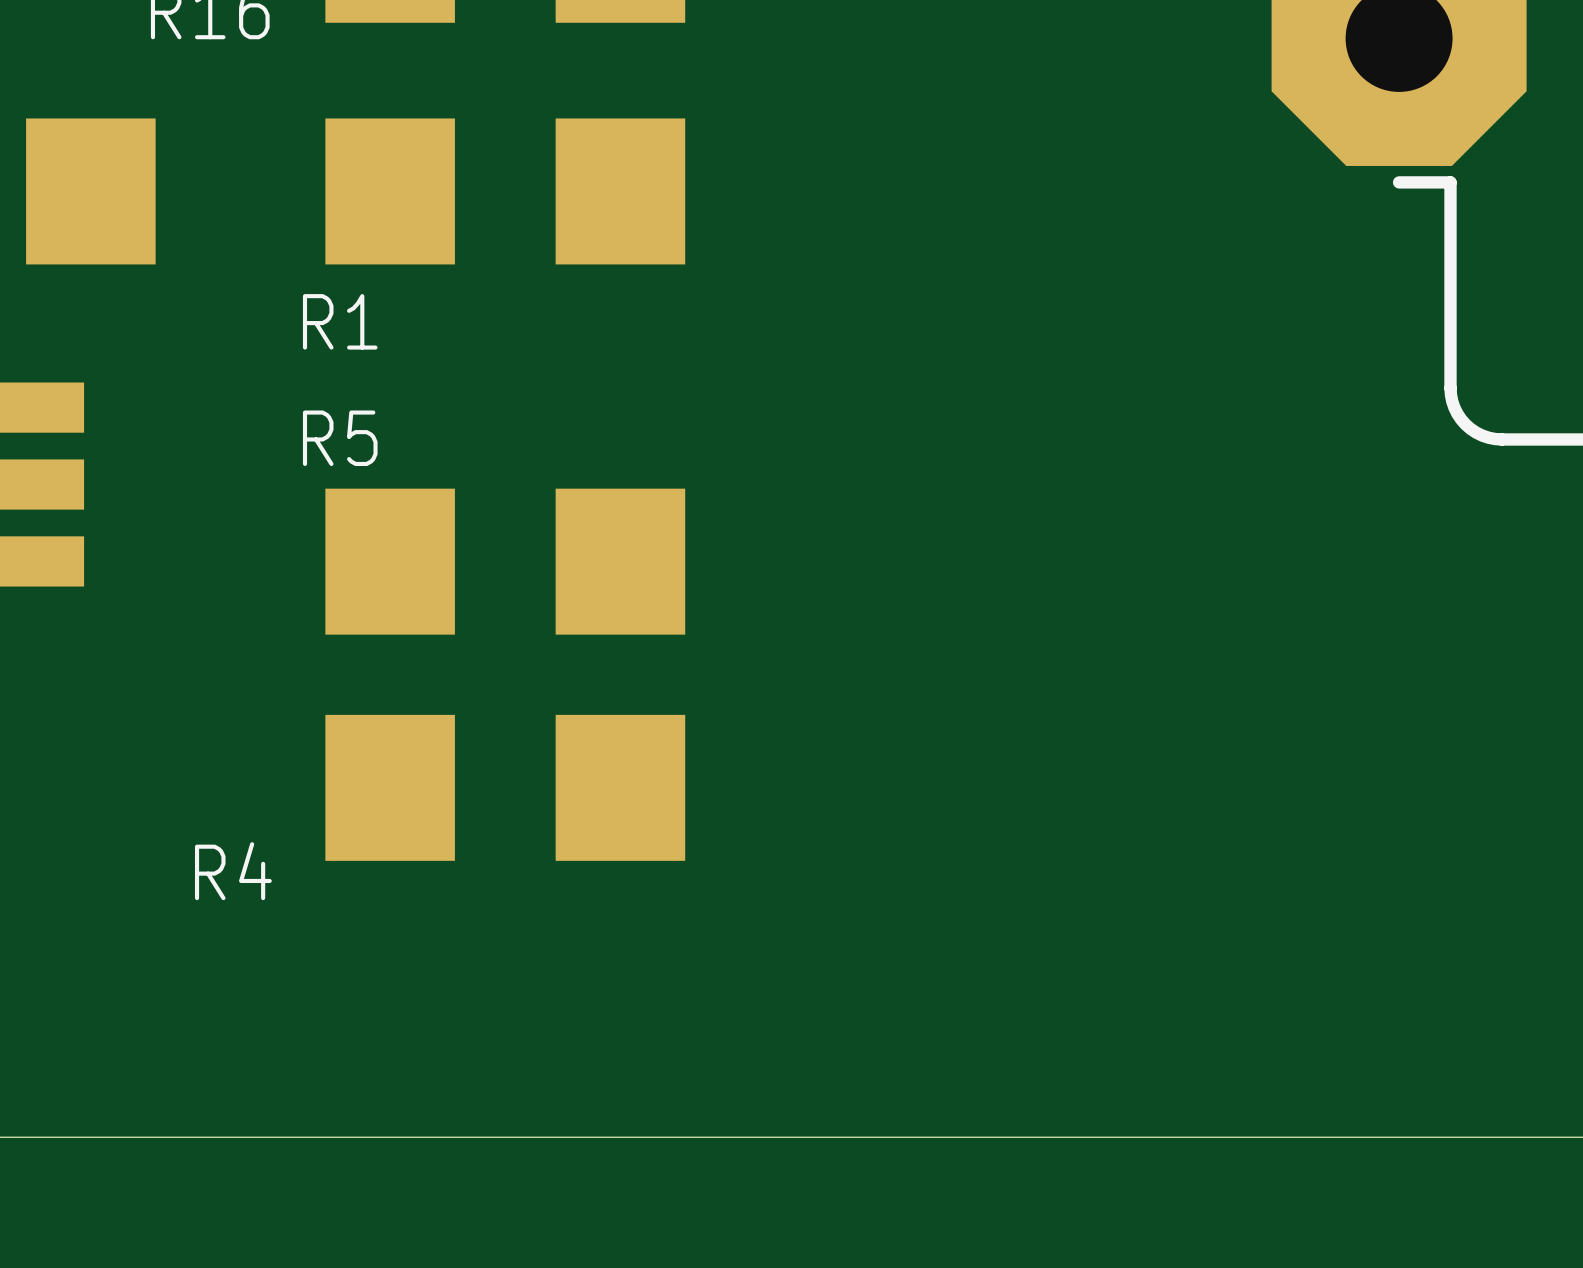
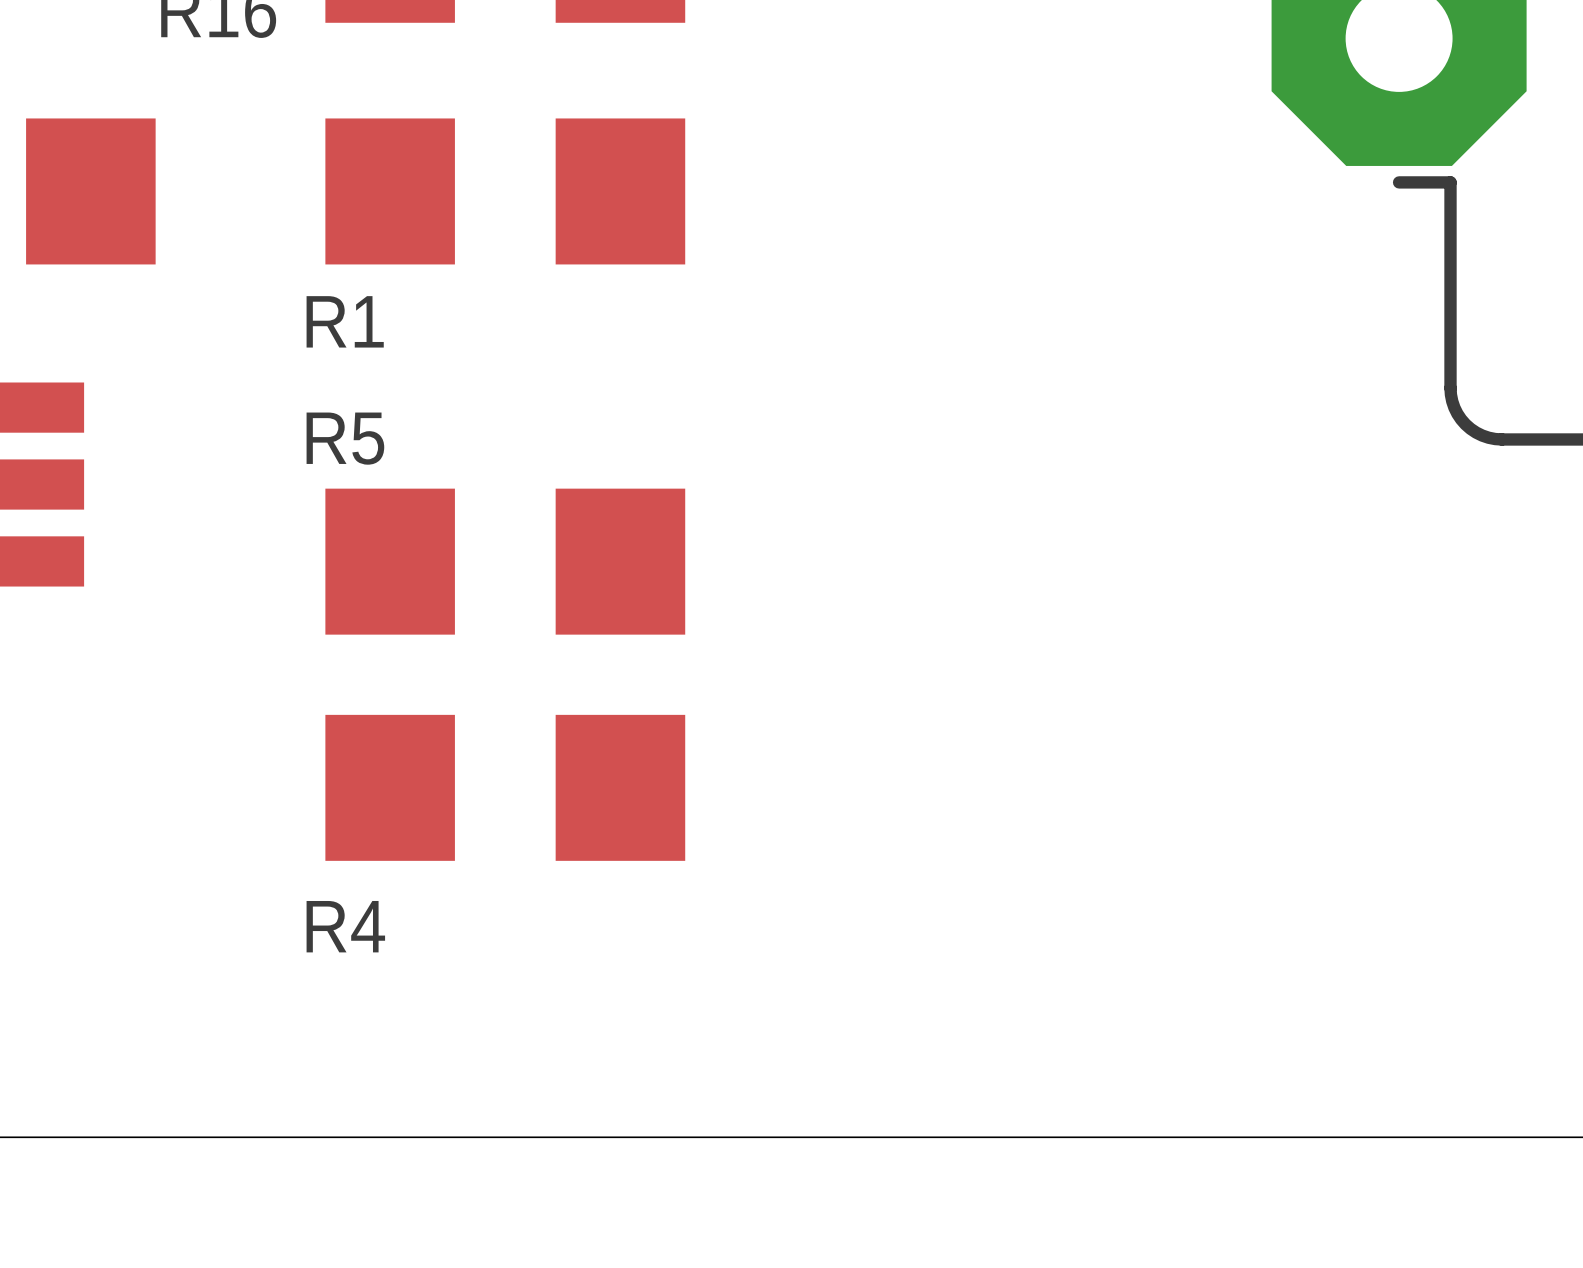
R4 name position: R4 (233, 871) -> R4 (345, 926)

